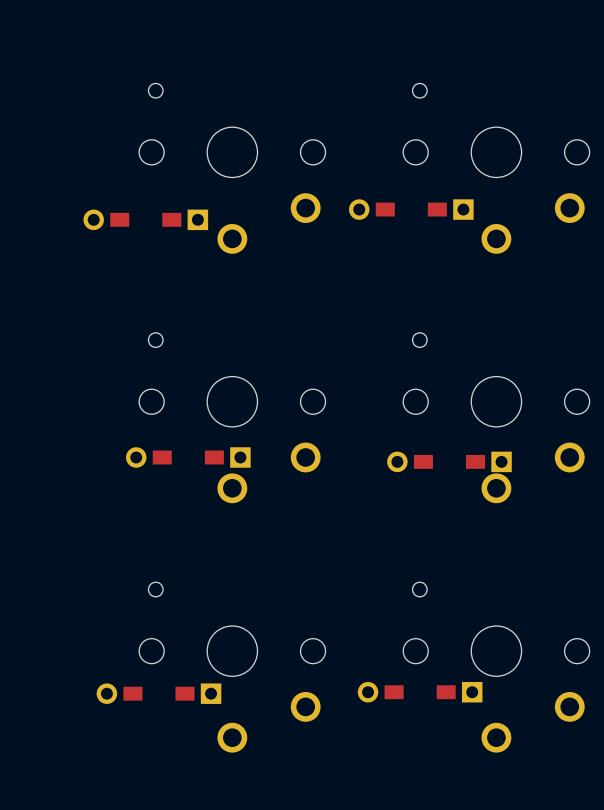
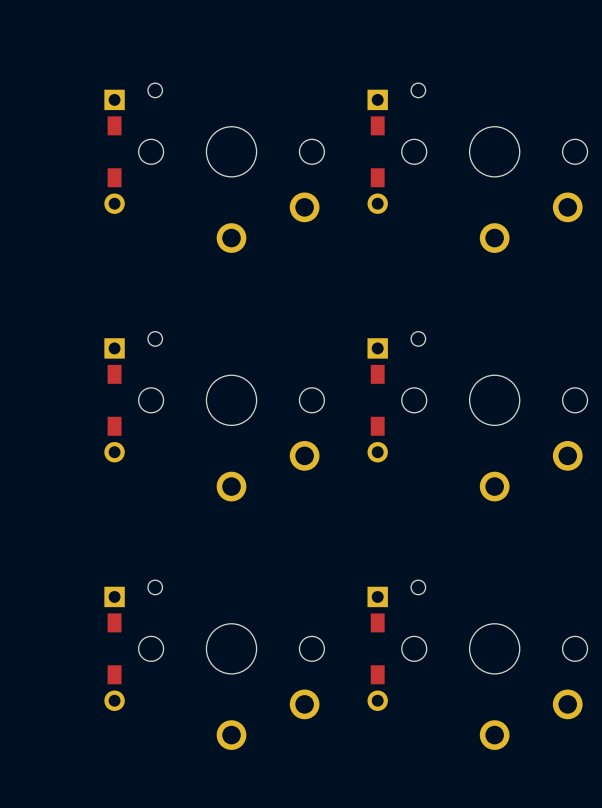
part rotation: 0° (411, 209) -> 90° counterclockwise (377, 151)
part rotation: 0° (145, 219) -> 90° counterclockwise (114, 151)
part: none -> (114, 400)
part: (188, 457) -> none
part rotation: 0° (449, 461) -> 90° counterclockwise (377, 400)
part position: (449, 461) -> (377, 400)
part rotation: 0° (420, 692) -> 90° counterclockwise (377, 648)
part rotation: 0° (158, 693) -> 90° counterclockwise (114, 648)

